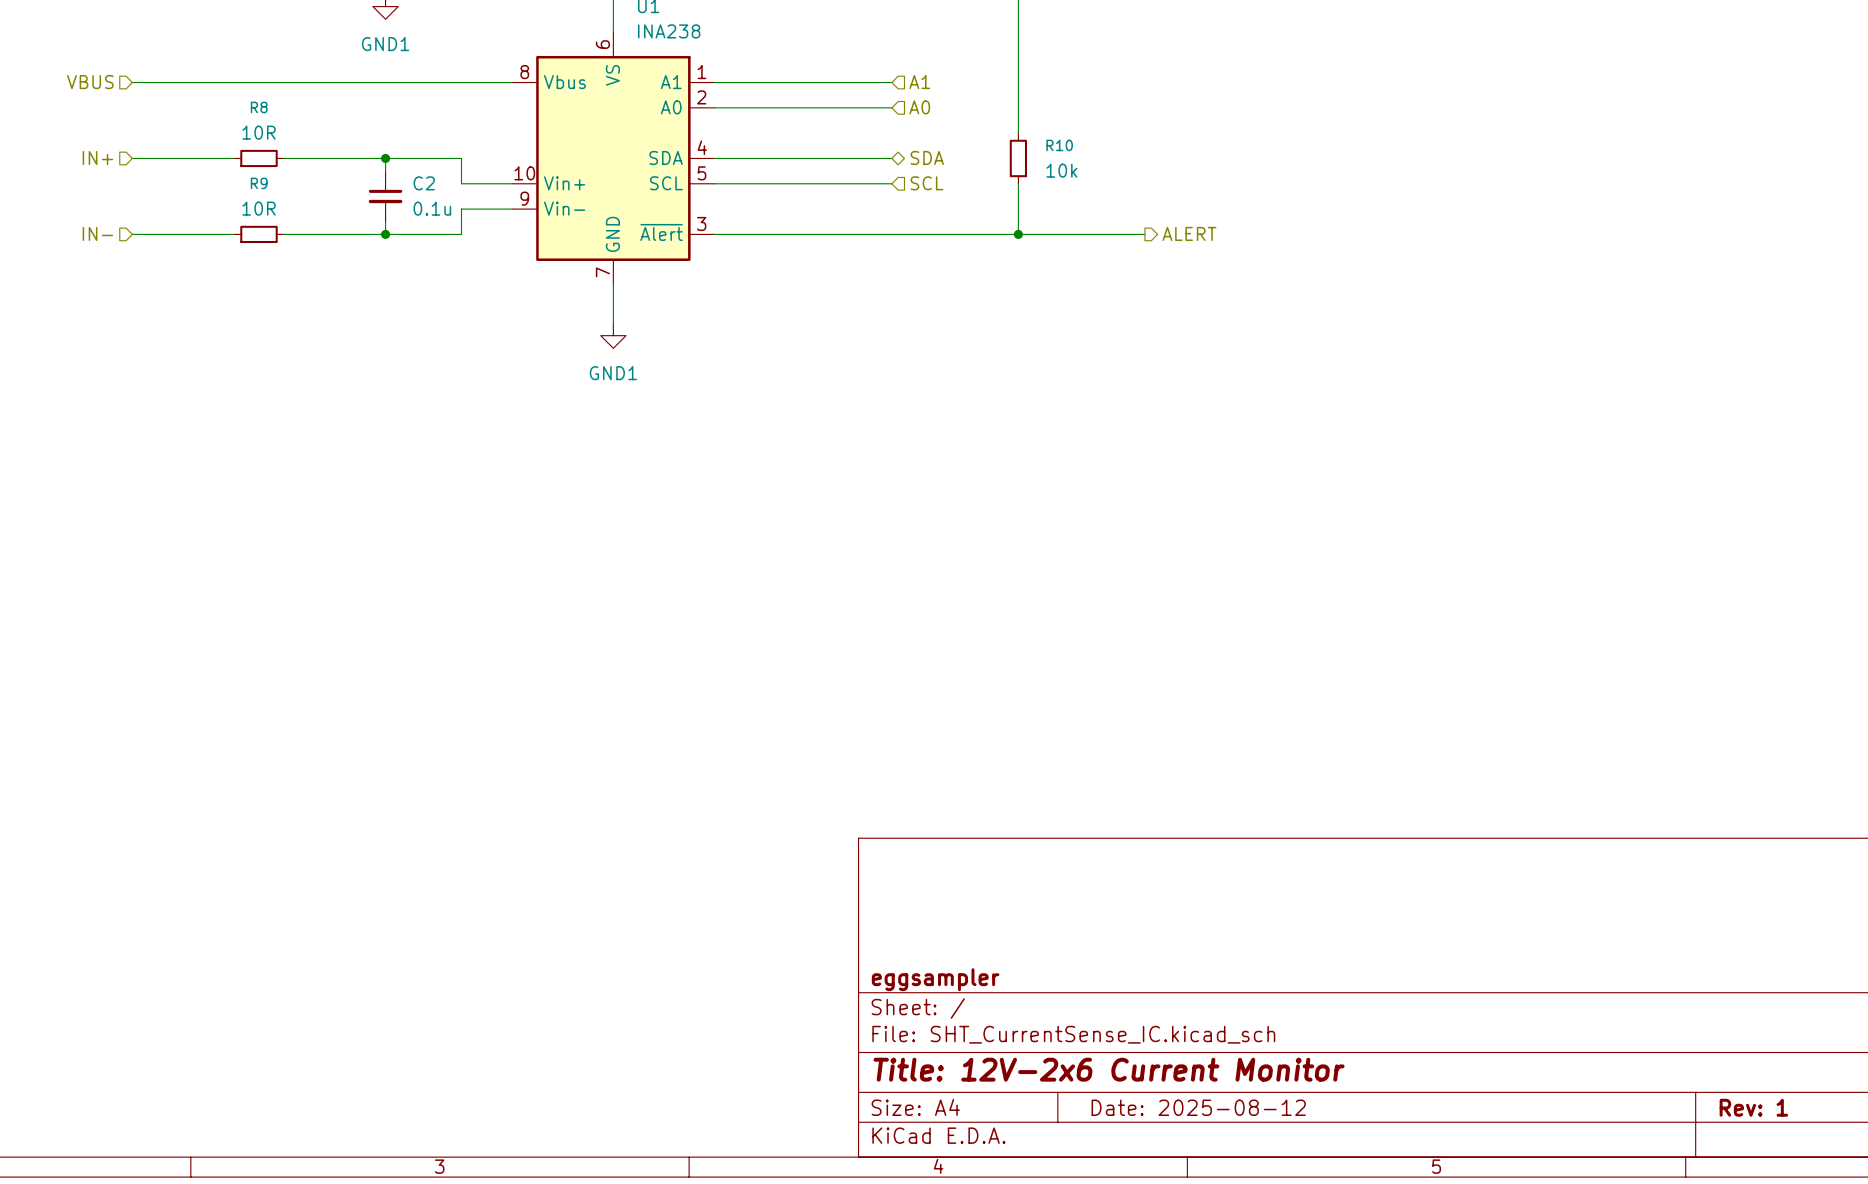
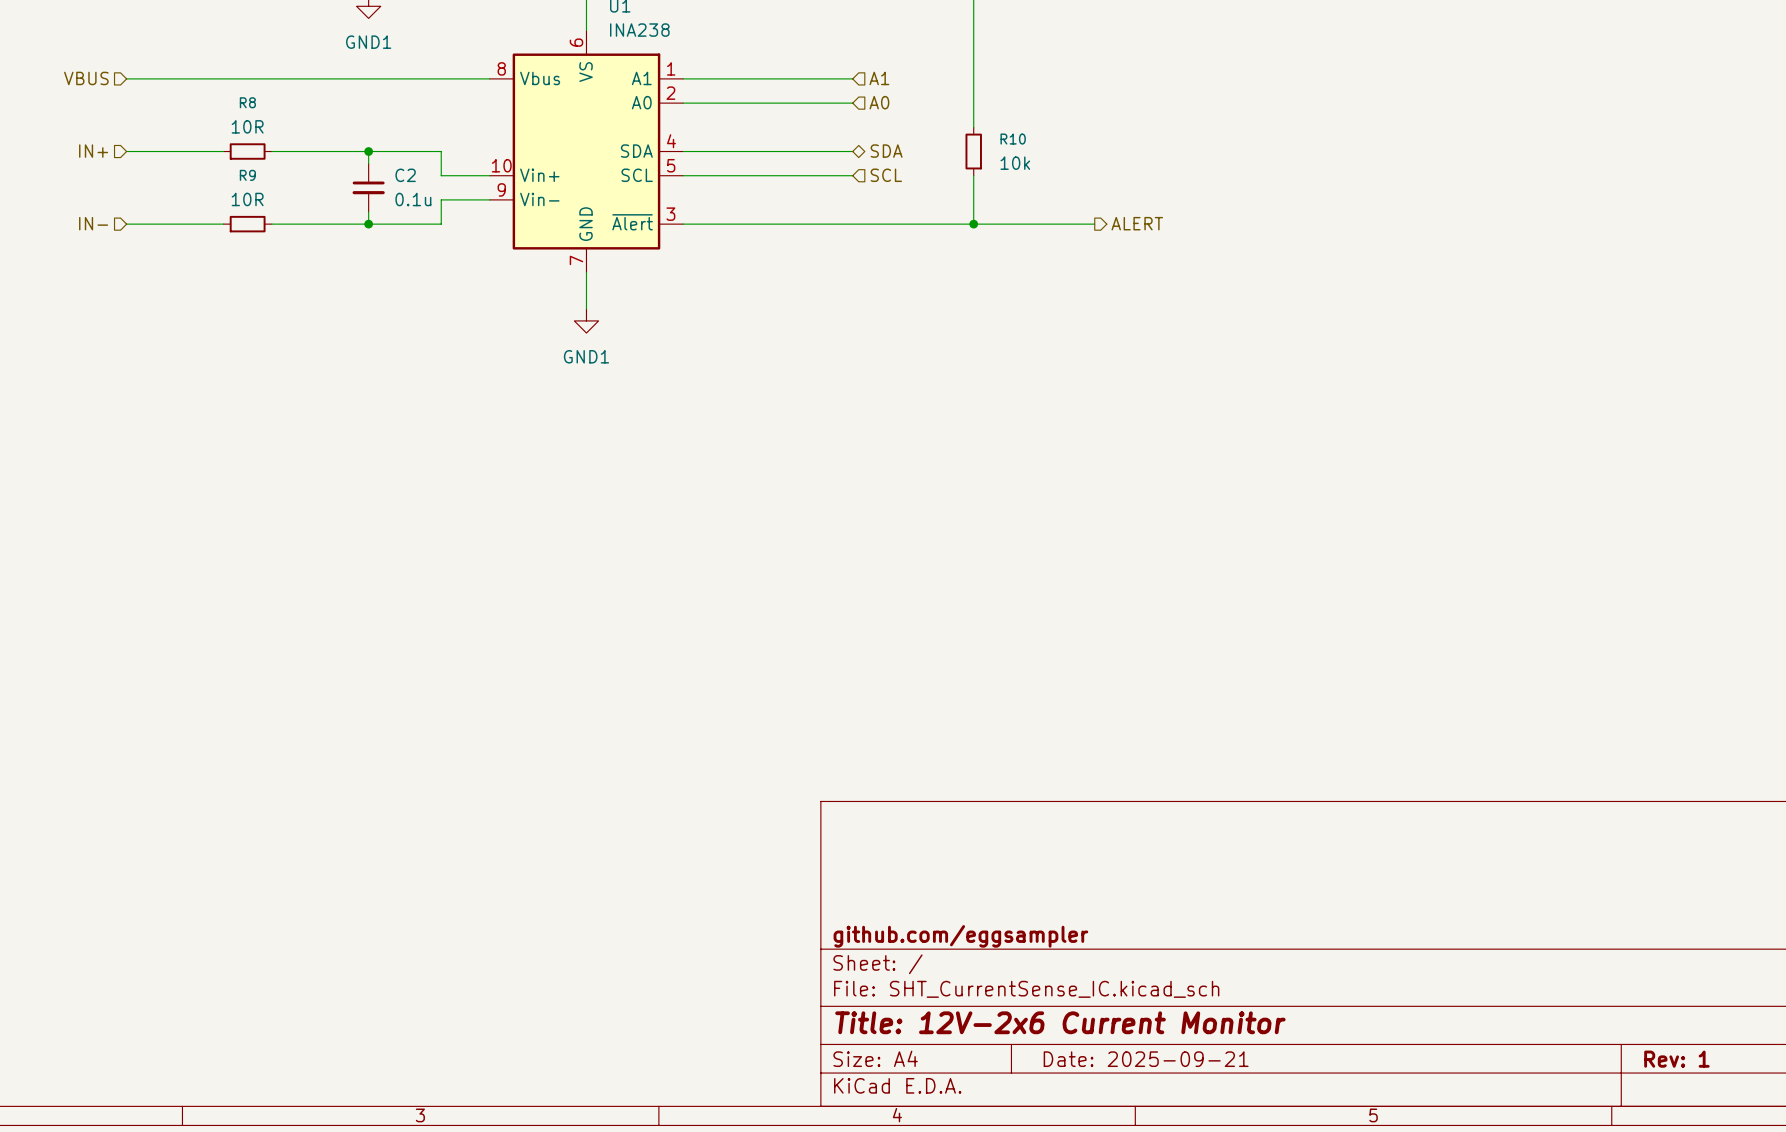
title block: eggsampler (935, 979) -> github.com/eggsampler (960, 936)
title block: Date: 2025-08-12 (1198, 1107) -> Date: 2025-09-21 (1146, 1059)

